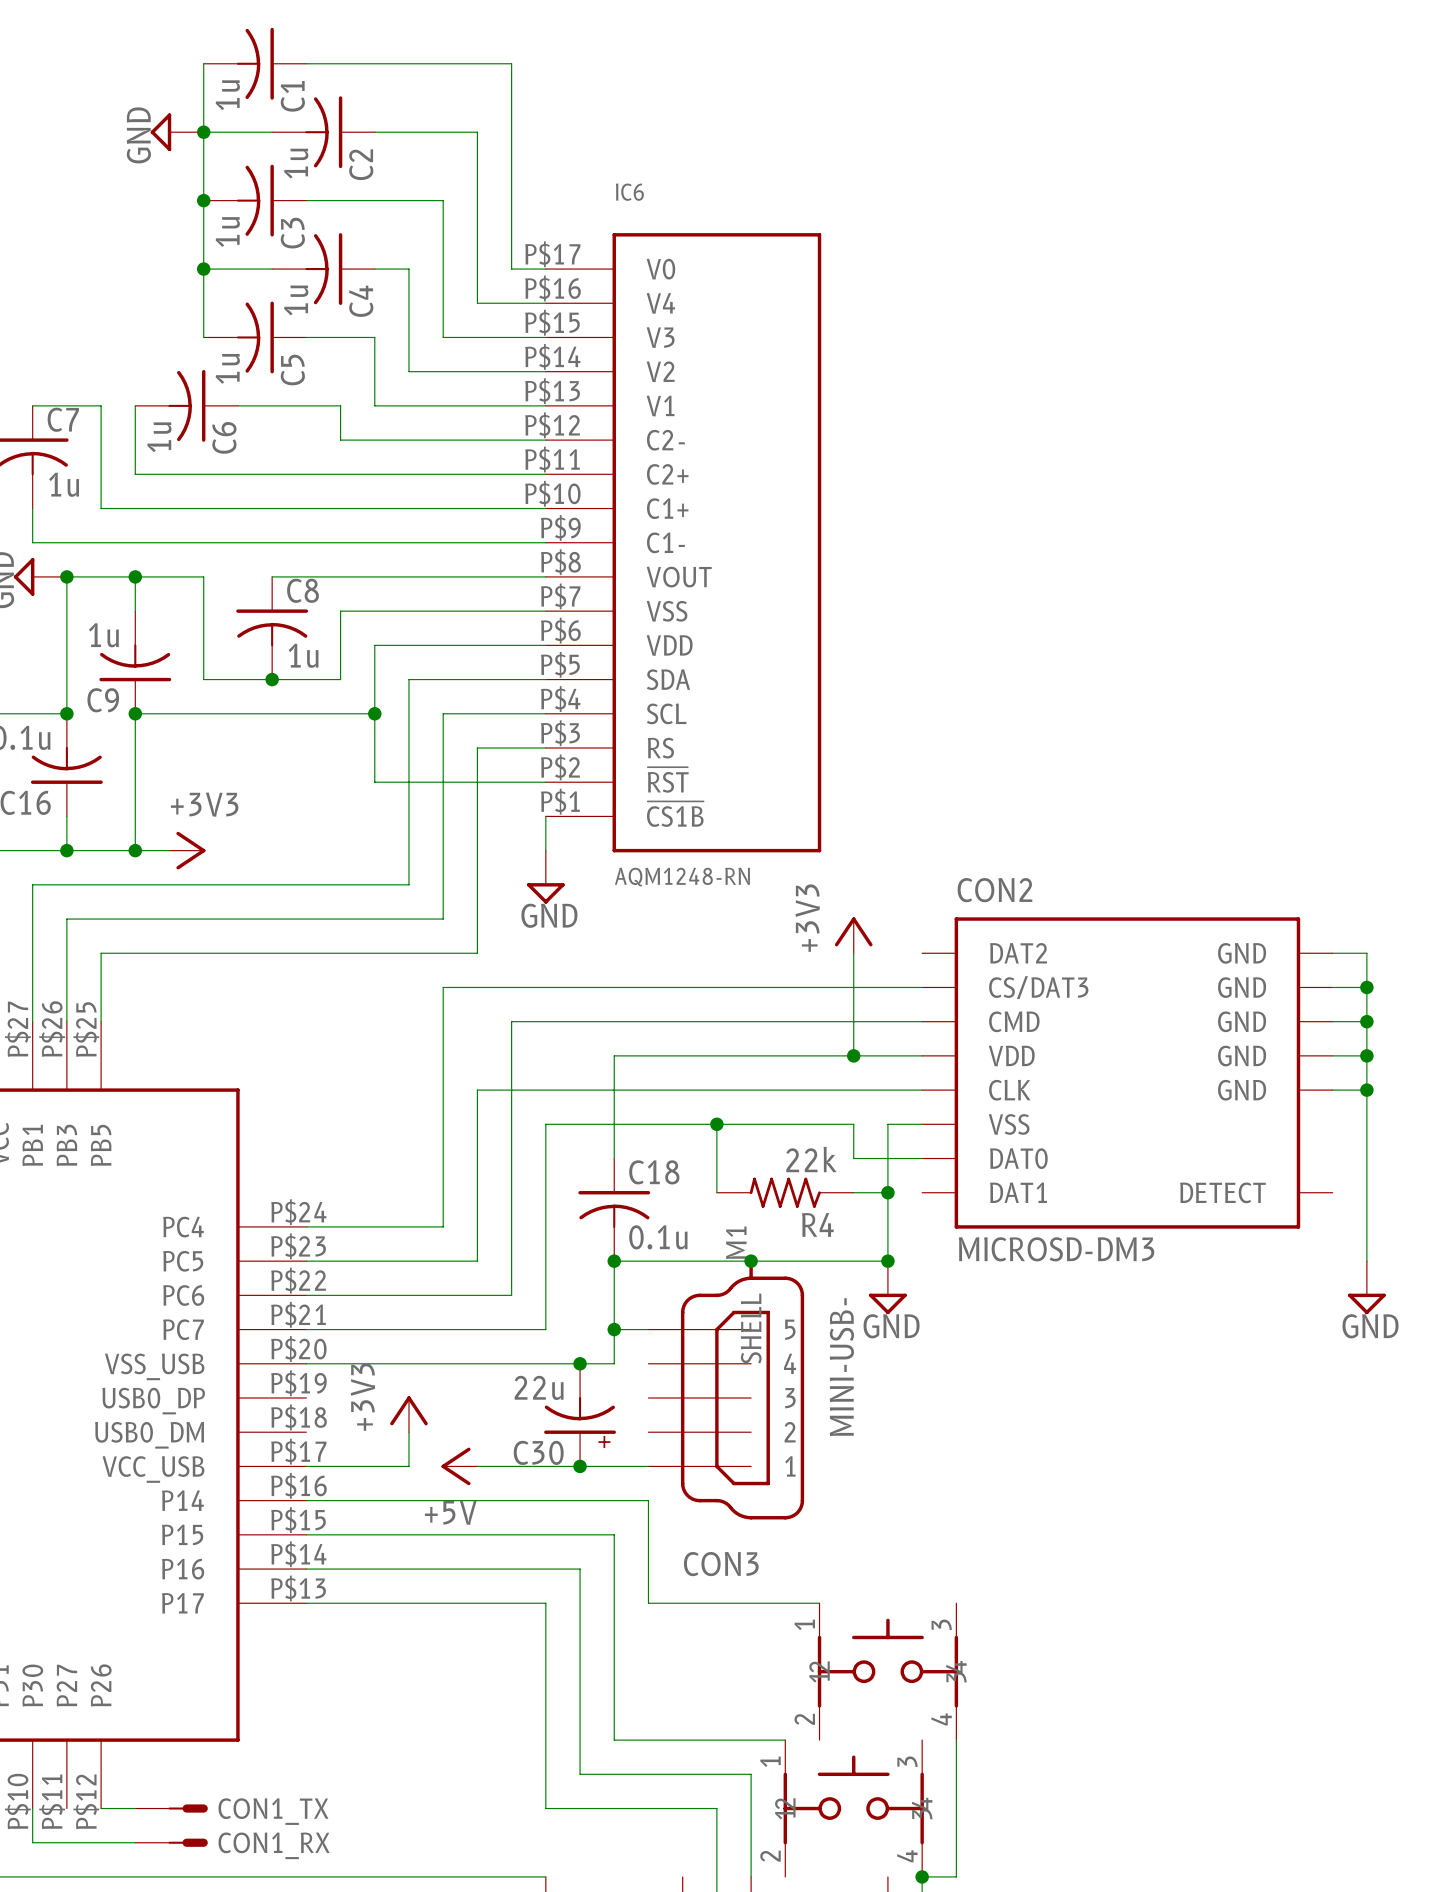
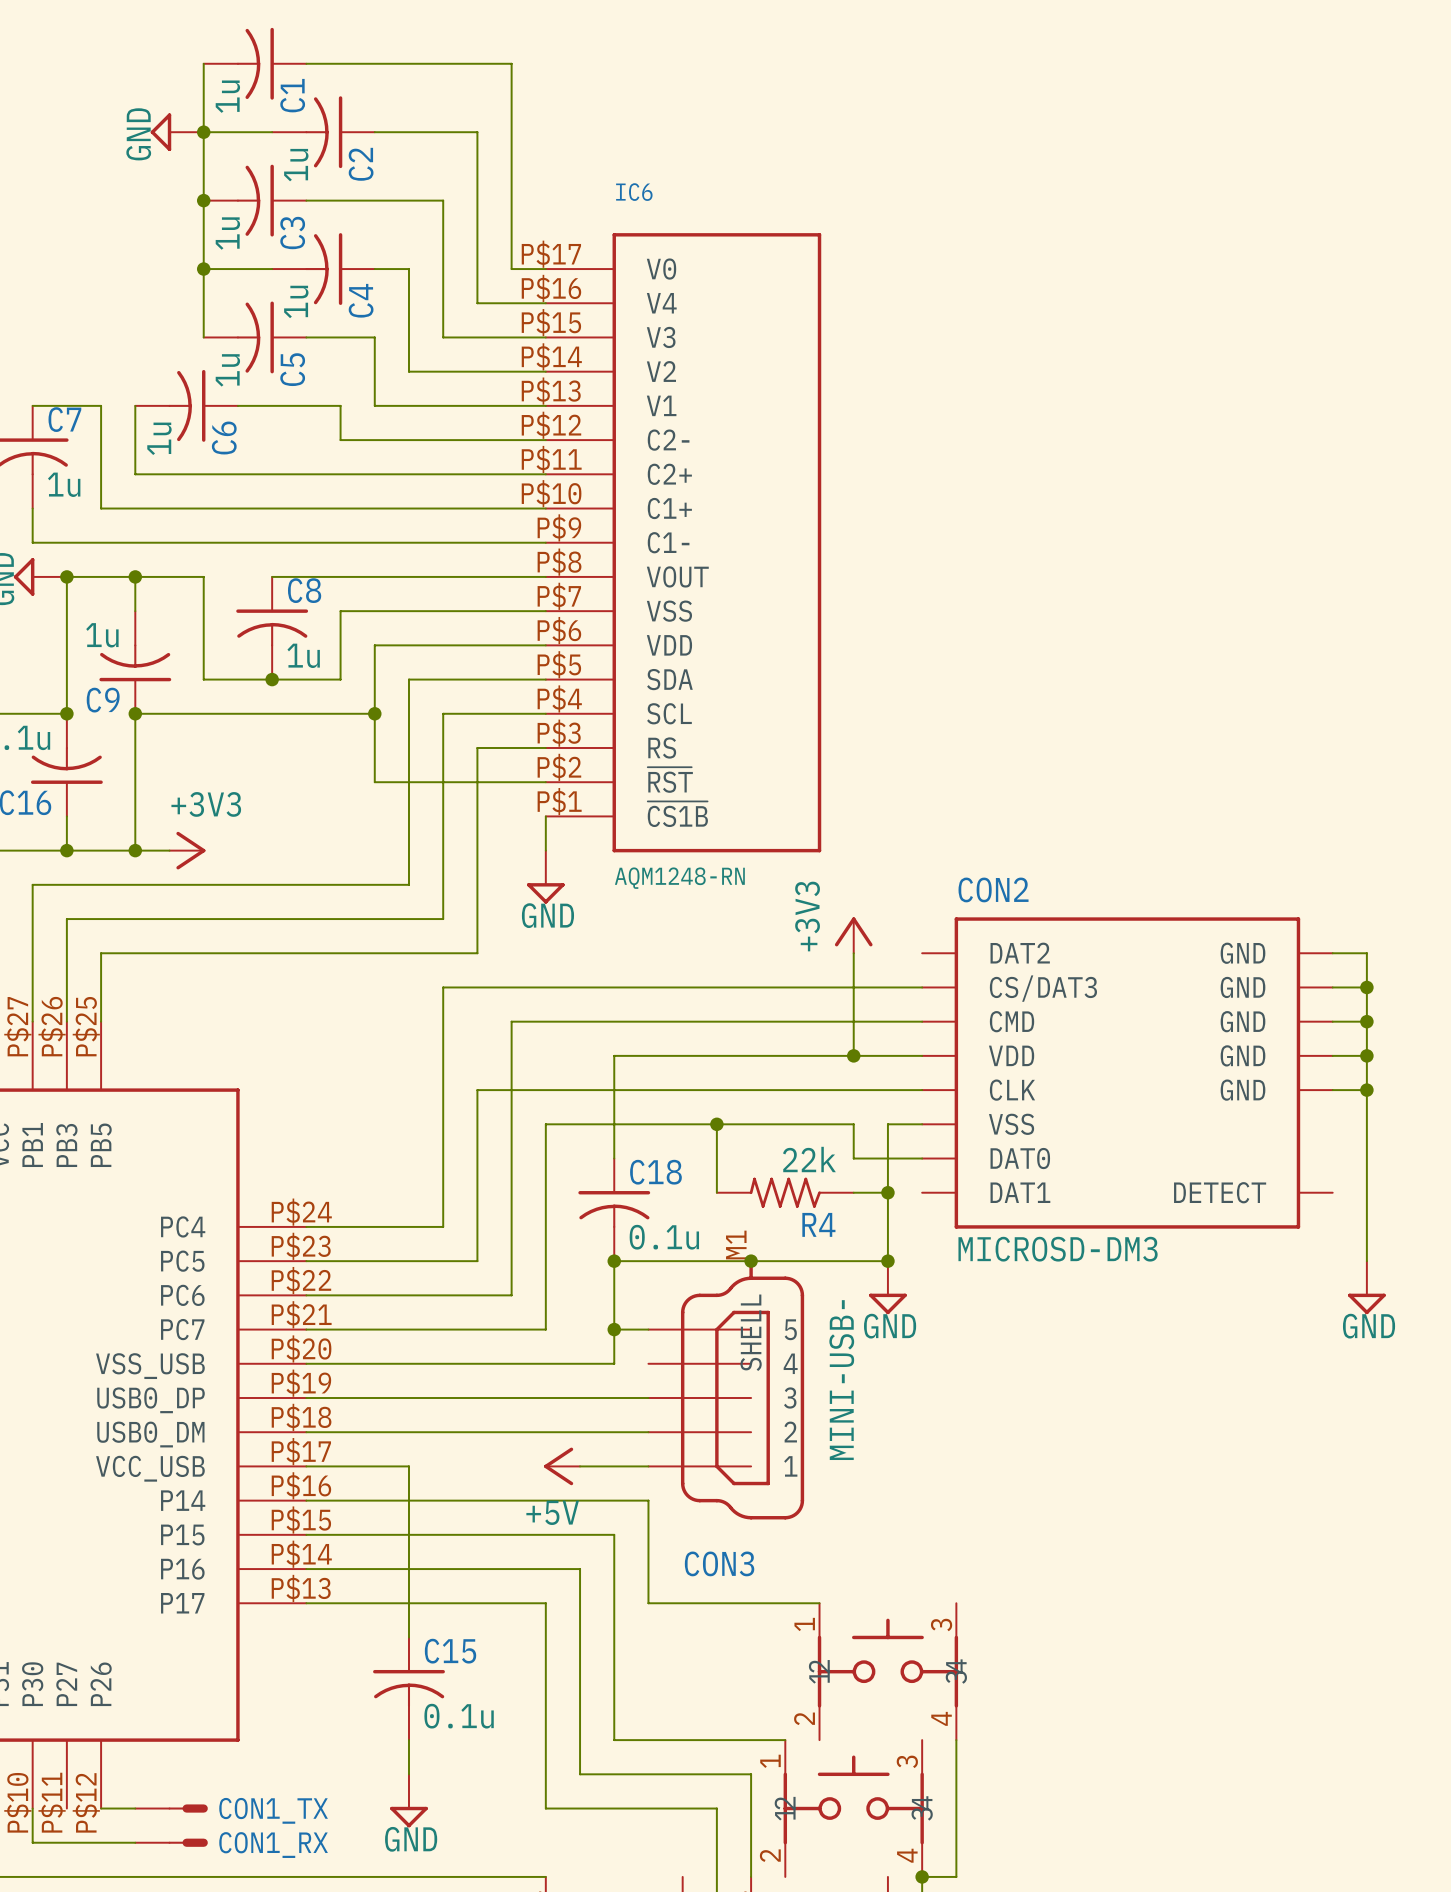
junction: (580, 1363) -> none
wire: none -> (306, 1397) (648, 1397)
power symbol: +3V3 (408, 1414) -> none
C30: 22u (580, 1415) -> none
wire: none -> (306, 1432) (648, 1432)
wire: (408, 1432) (408, 1466) -> (408, 1637) (408, 1466)
power symbol position: +5V (459, 1466) -> +5V (562, 1466)
wire: (477, 1466) (580, 1466) -> none
junction: (580, 1466) -> none
C15: none -> 0.1u (408, 1688)
wire: none -> (408, 1740) (408, 1774)
power symbol: none -> GND (408, 1800)

